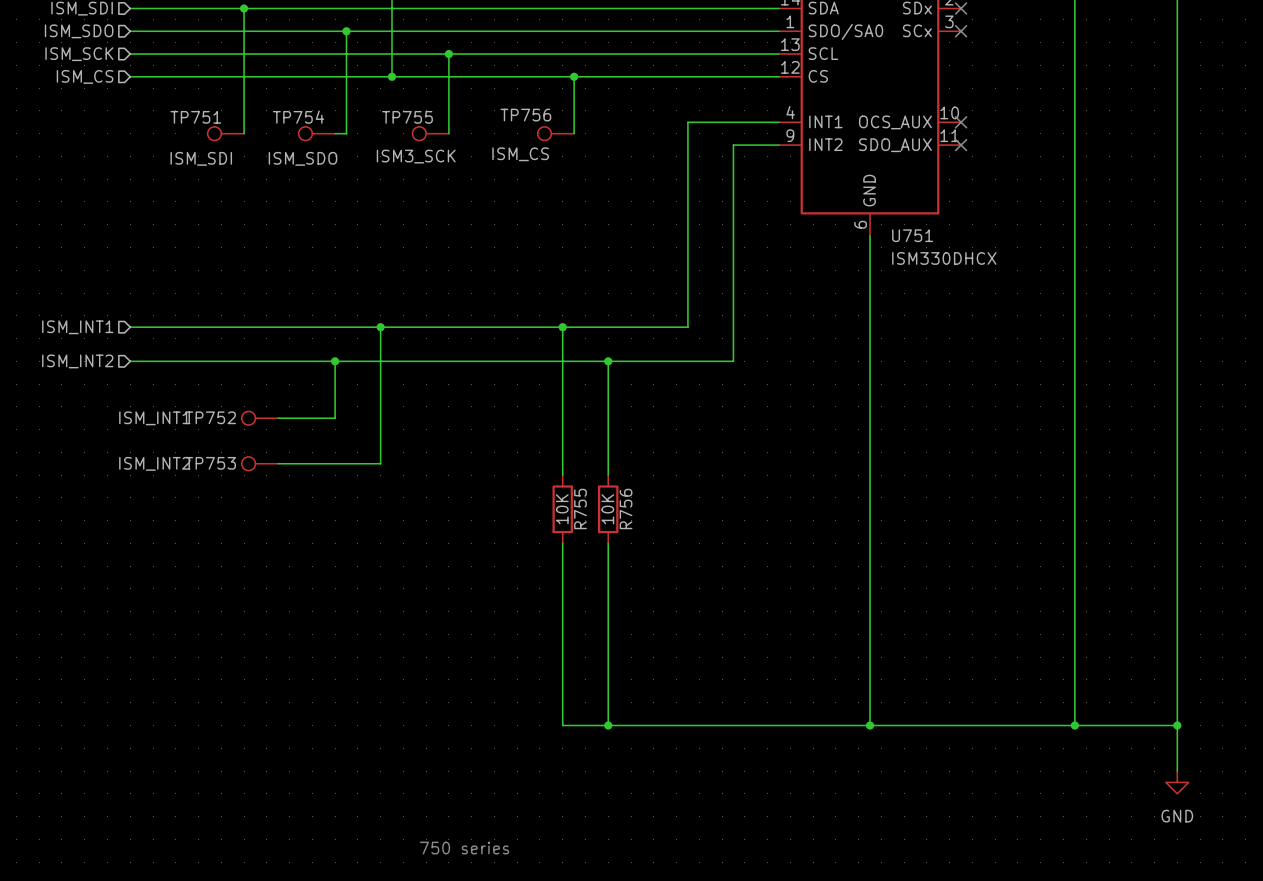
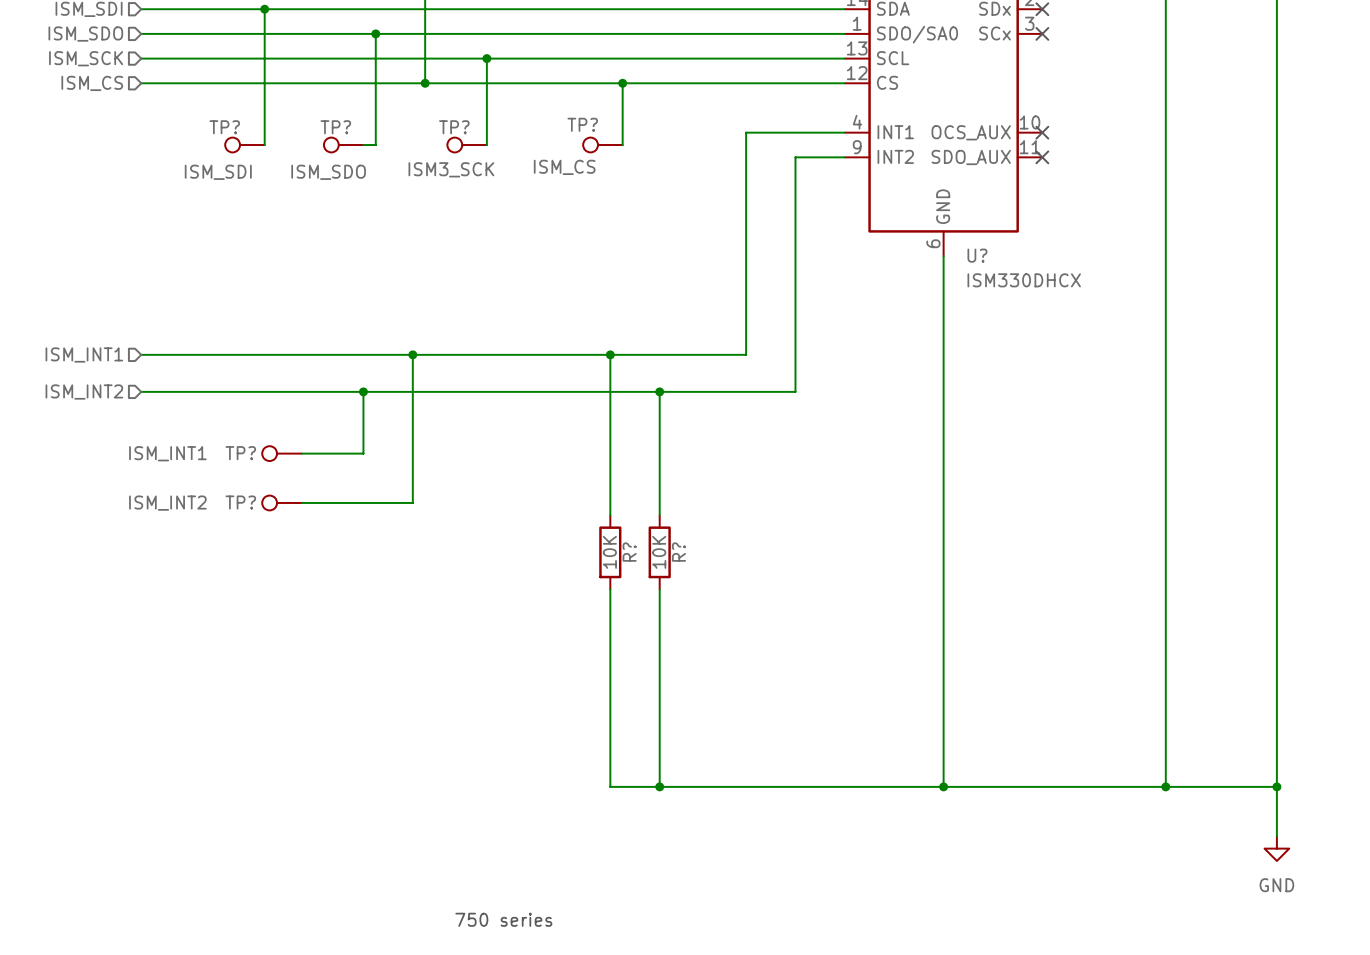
TP756 name: TP756 (525, 115) -> TP? (582, 124)
TP751 name: TP751 (195, 117) -> TP? (224, 127)
TP754 name: TP754 (298, 117) -> TP? (335, 127)
TP755 name: TP755 (407, 117) -> TP? (454, 127)
U751 name: U751 (912, 235) -> U? (977, 255)
TP752 name: TP752 (210, 417) -> TP? (240, 453)
TP753 name: TP753 (210, 463) -> TP? (240, 502)
R755 name: R755 (580, 509) -> R? (629, 552)
R756 name: R756 (626, 509) -> R? (678, 552)

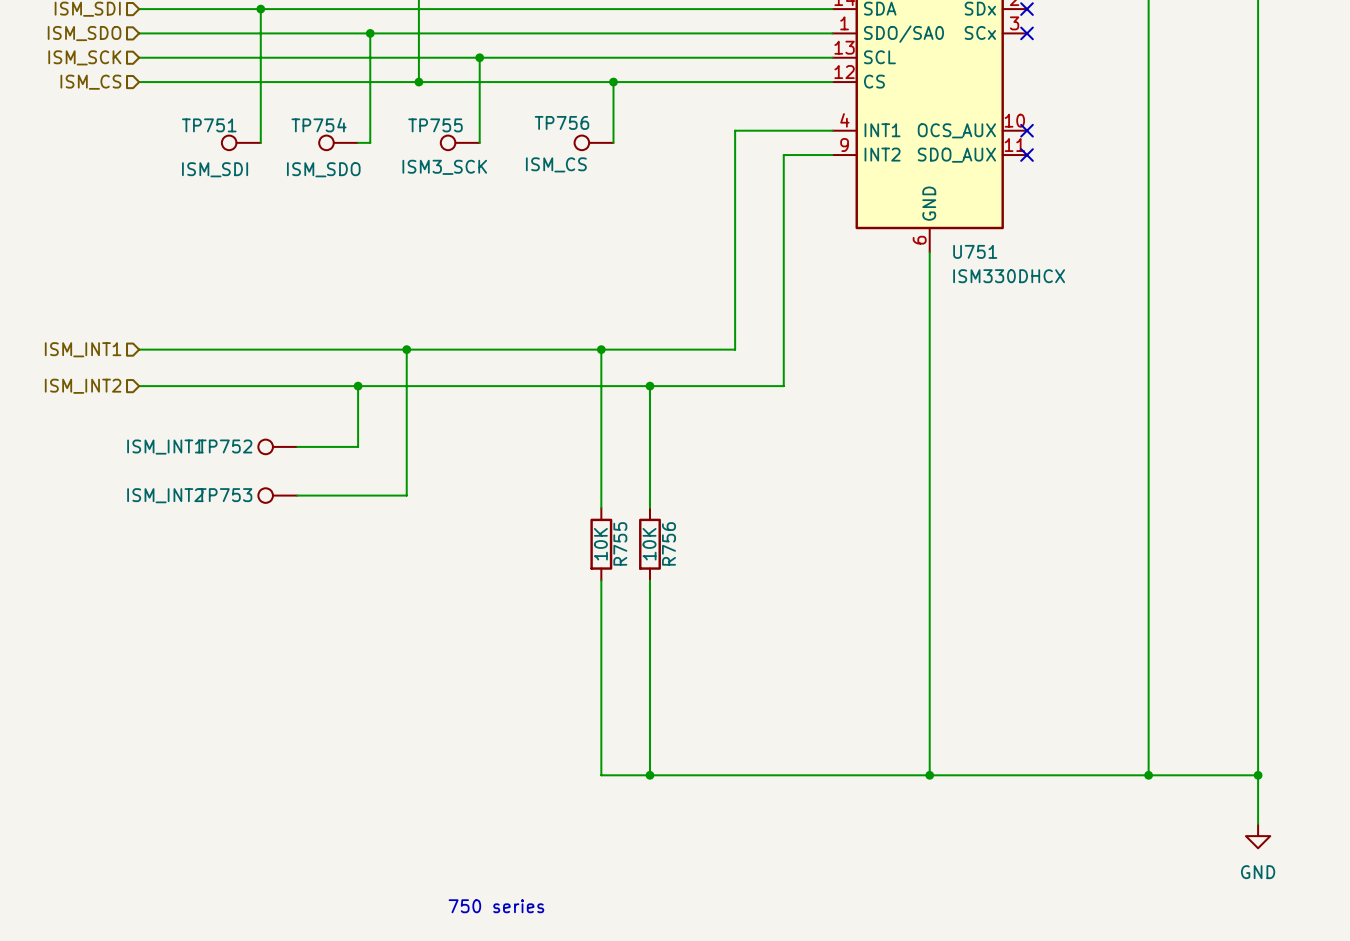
TP? name: TP? (582, 124) -> TP756 (561, 122)
TP? name: TP? (224, 127) -> TP751 (209, 125)
TP? name: TP? (335, 127) -> TP754 (319, 125)
TP? name: TP? (454, 127) -> TP755 (435, 125)
U? name: U? (977, 255) -> U751 (975, 251)
TP? name: TP? (240, 453) -> TP752 (225, 446)
TP? name: TP? (240, 502) -> TP753 (225, 495)
R? name: R? (629, 552) -> R755 (620, 543)
R? name: R? (678, 552) -> R756 (668, 543)

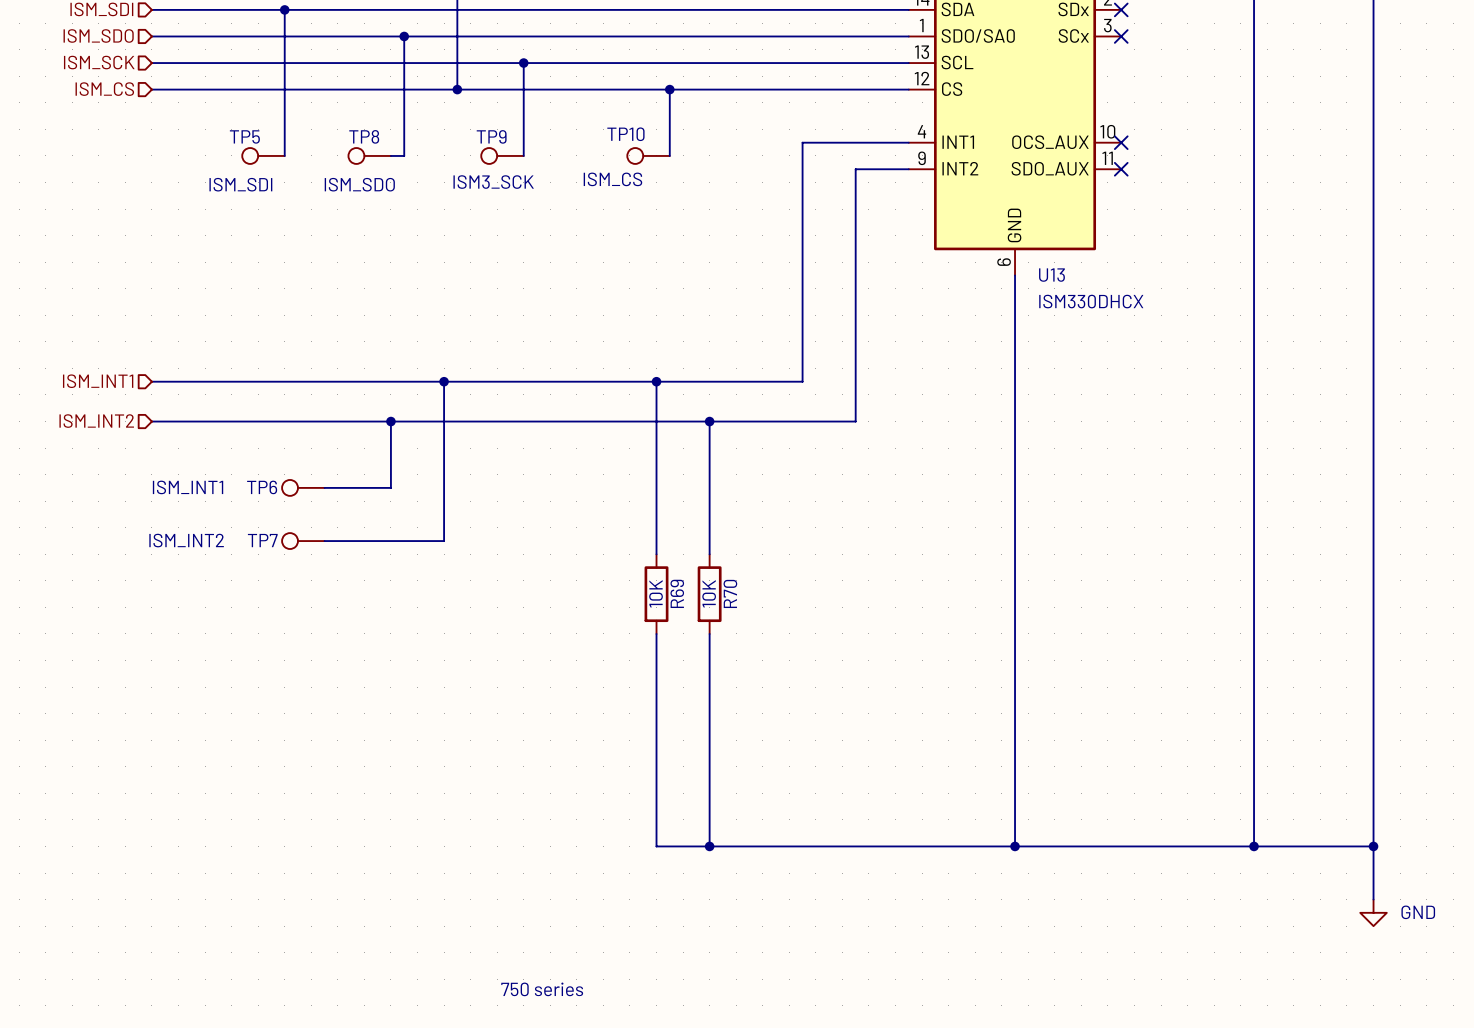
TP756 name: TP756 (561, 122) -> TP10 (625, 134)
TP751 name: TP751 (209, 125) -> TP5 (244, 136)
TP754 name: TP754 (319, 125) -> TP8 (364, 136)
TP755 name: TP755 (435, 125) -> TP9 (491, 136)
U751 name: U751 (975, 251) -> U13 (1051, 275)
TP752 name: TP752 (225, 446) -> TP6 (262, 487)
TP753 name: TP753 (225, 495) -> TP7 (262, 540)
R755 name: R755 (620, 543) -> R69 (677, 593)
R756 name: R756 (668, 543) -> R70 (730, 593)
power symbol text position: GND (1258, 872) -> GND (1418, 912)

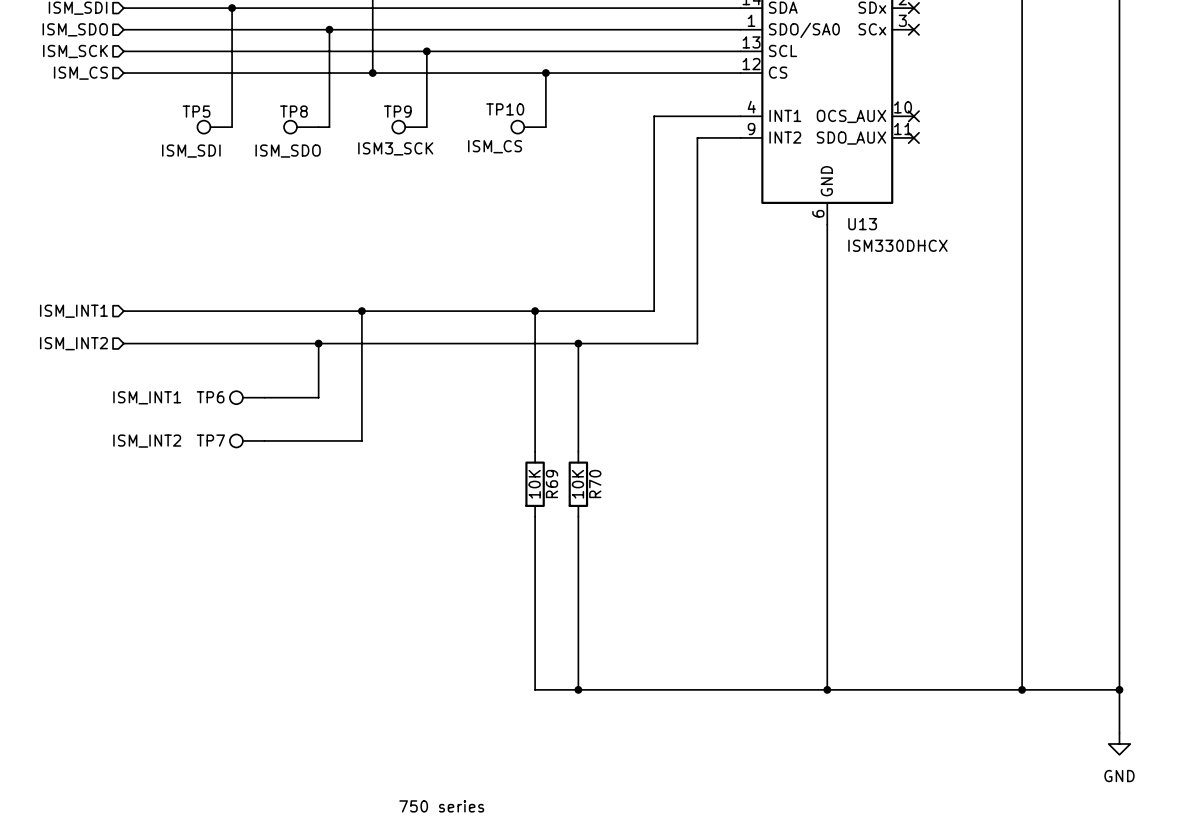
power symbol text position: GND (1418, 912) -> GND (1119, 776)

